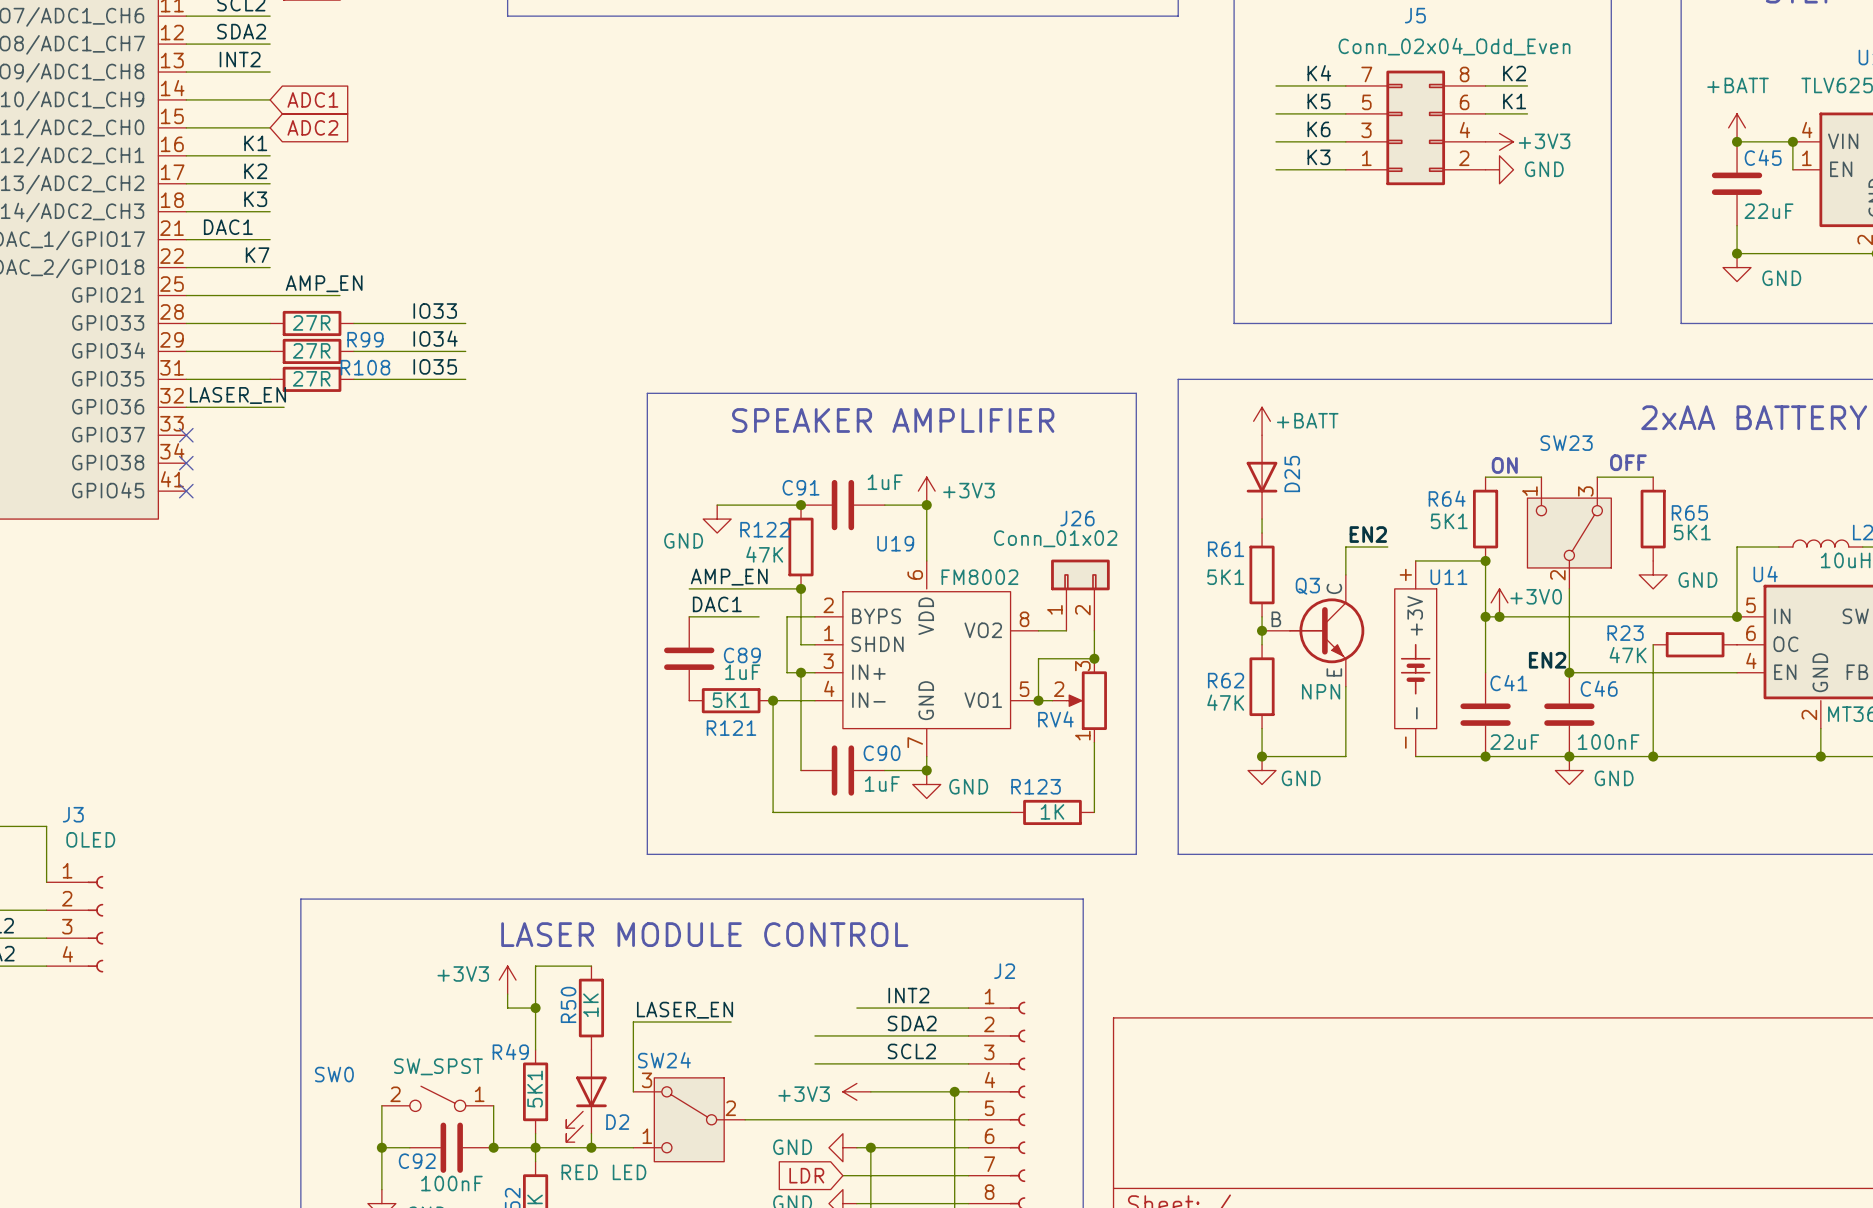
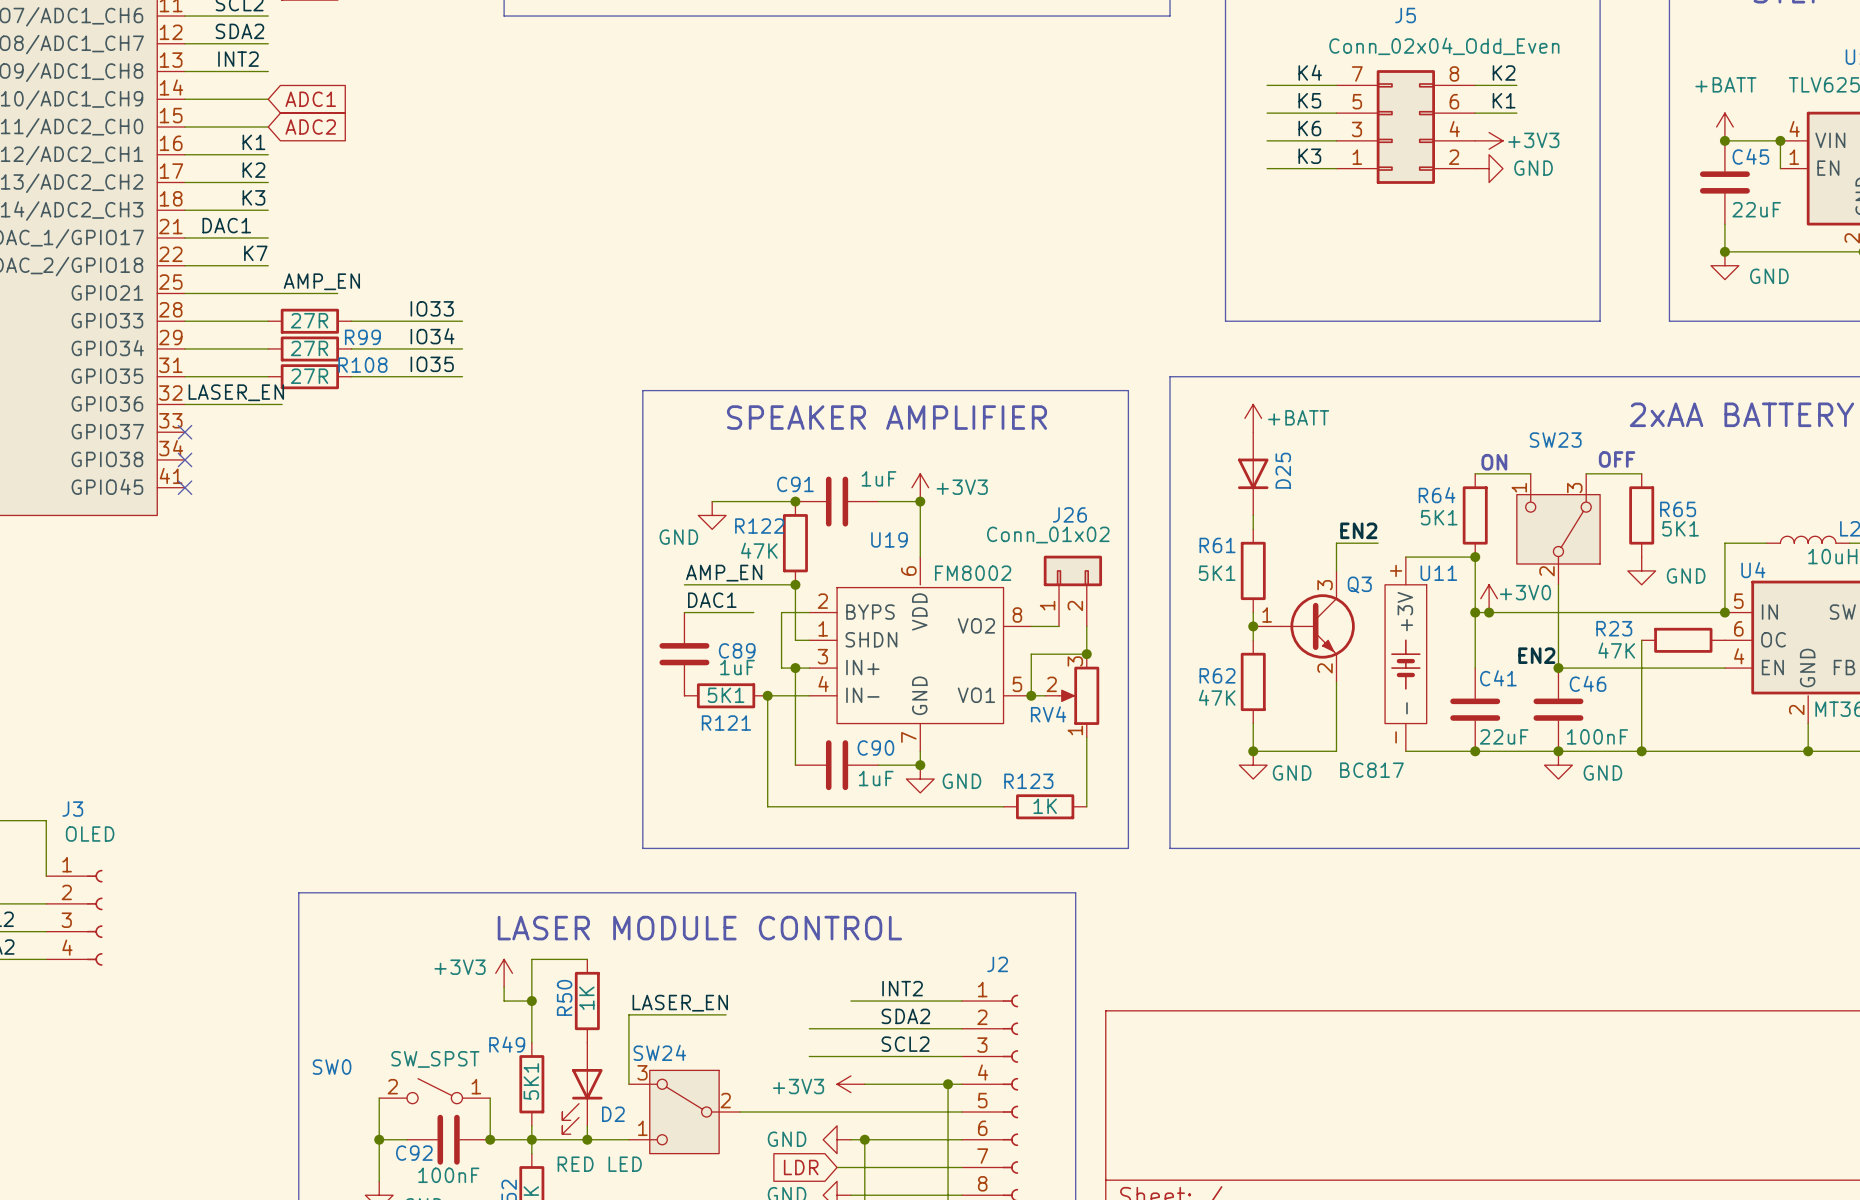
Q3 symbol: [1262, 574, 1365, 687] -> [1253, 570, 1355, 682]
Q3 name position: Q3 (1307, 586) -> Q3 (1359, 584)
Q3 value: NPN (1321, 691) -> BC817 (1371, 770)

